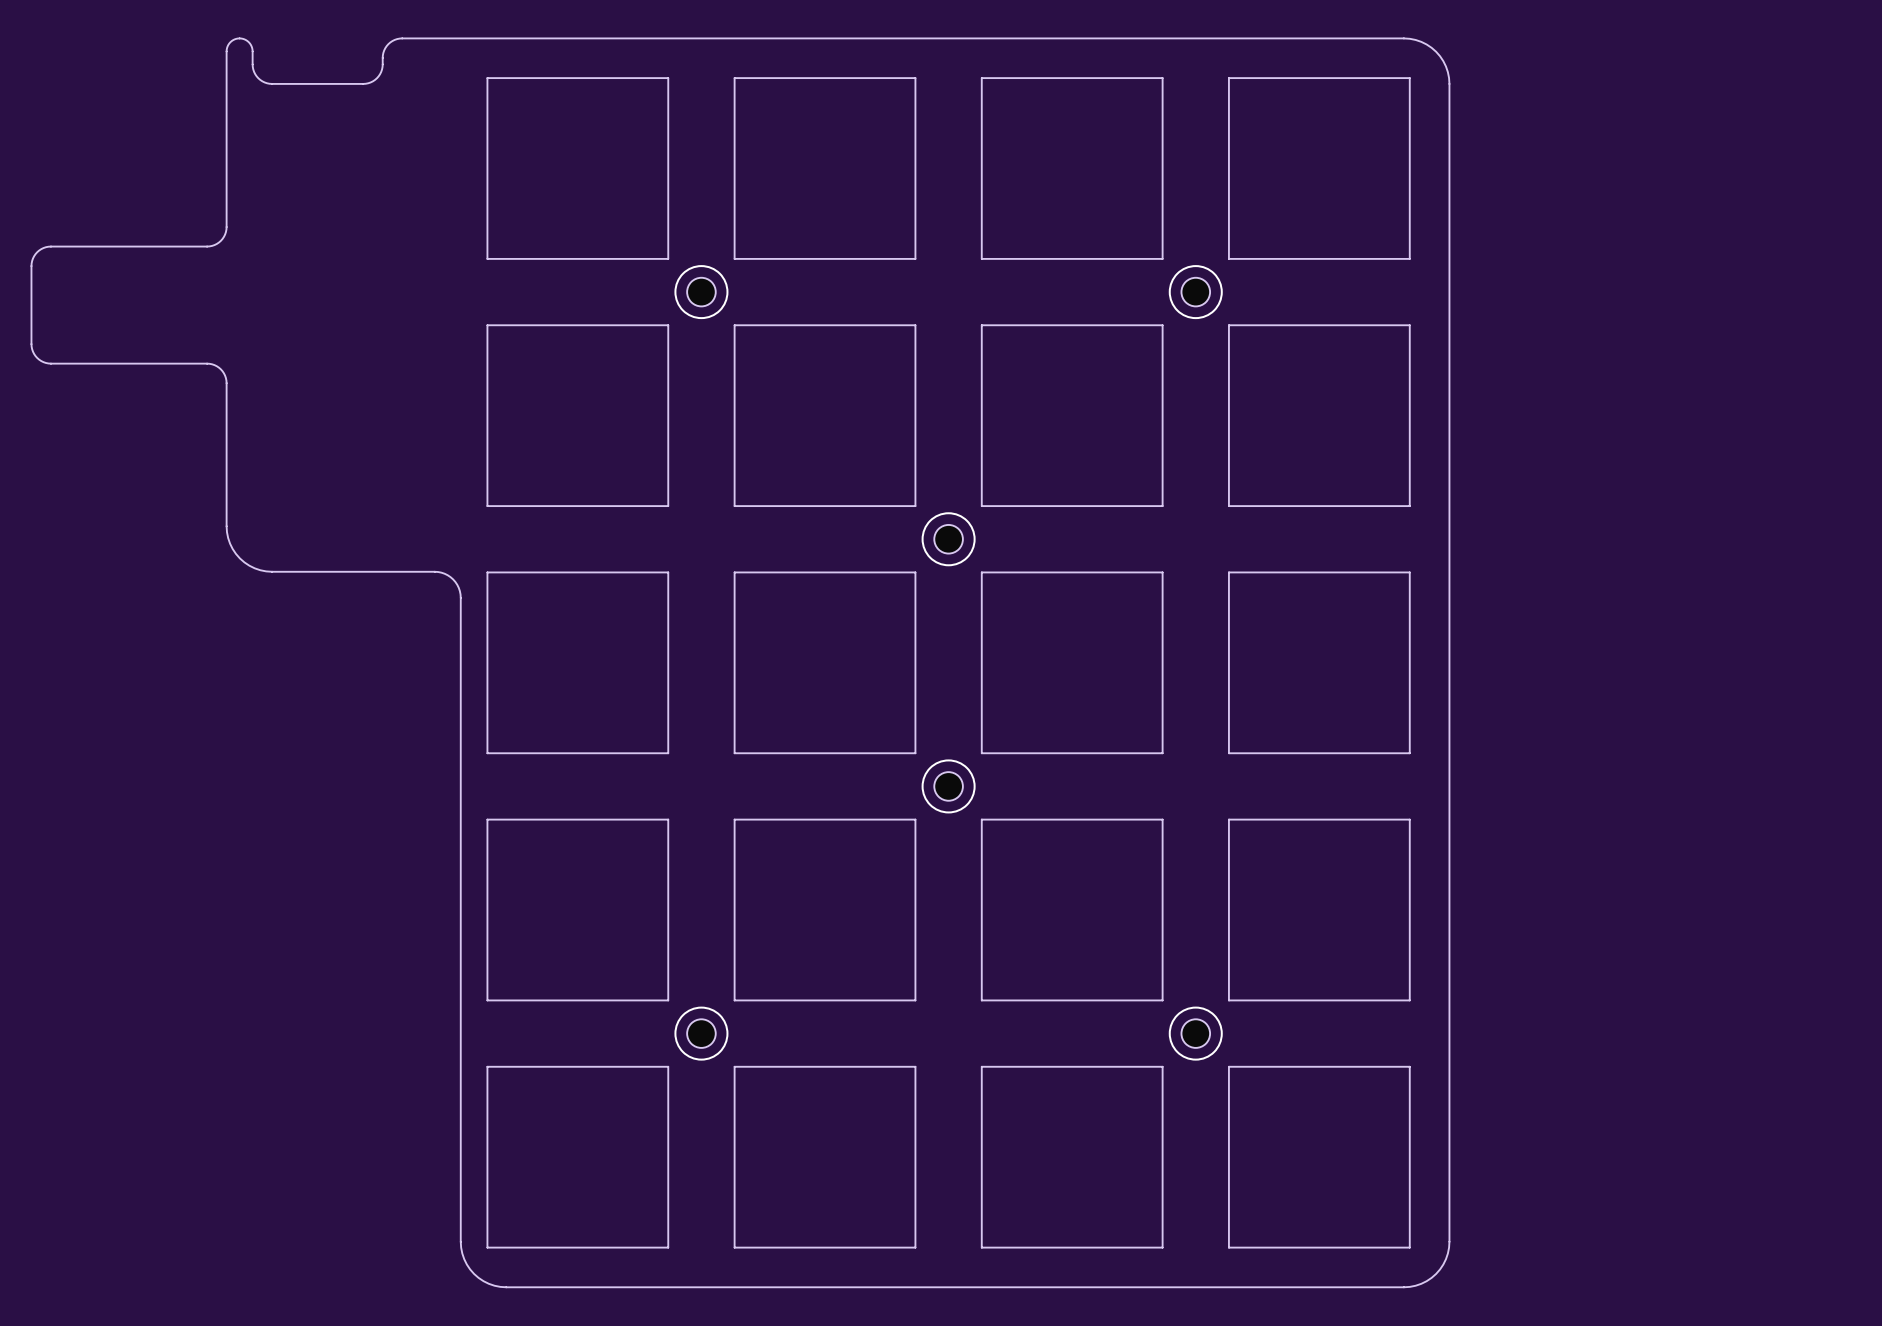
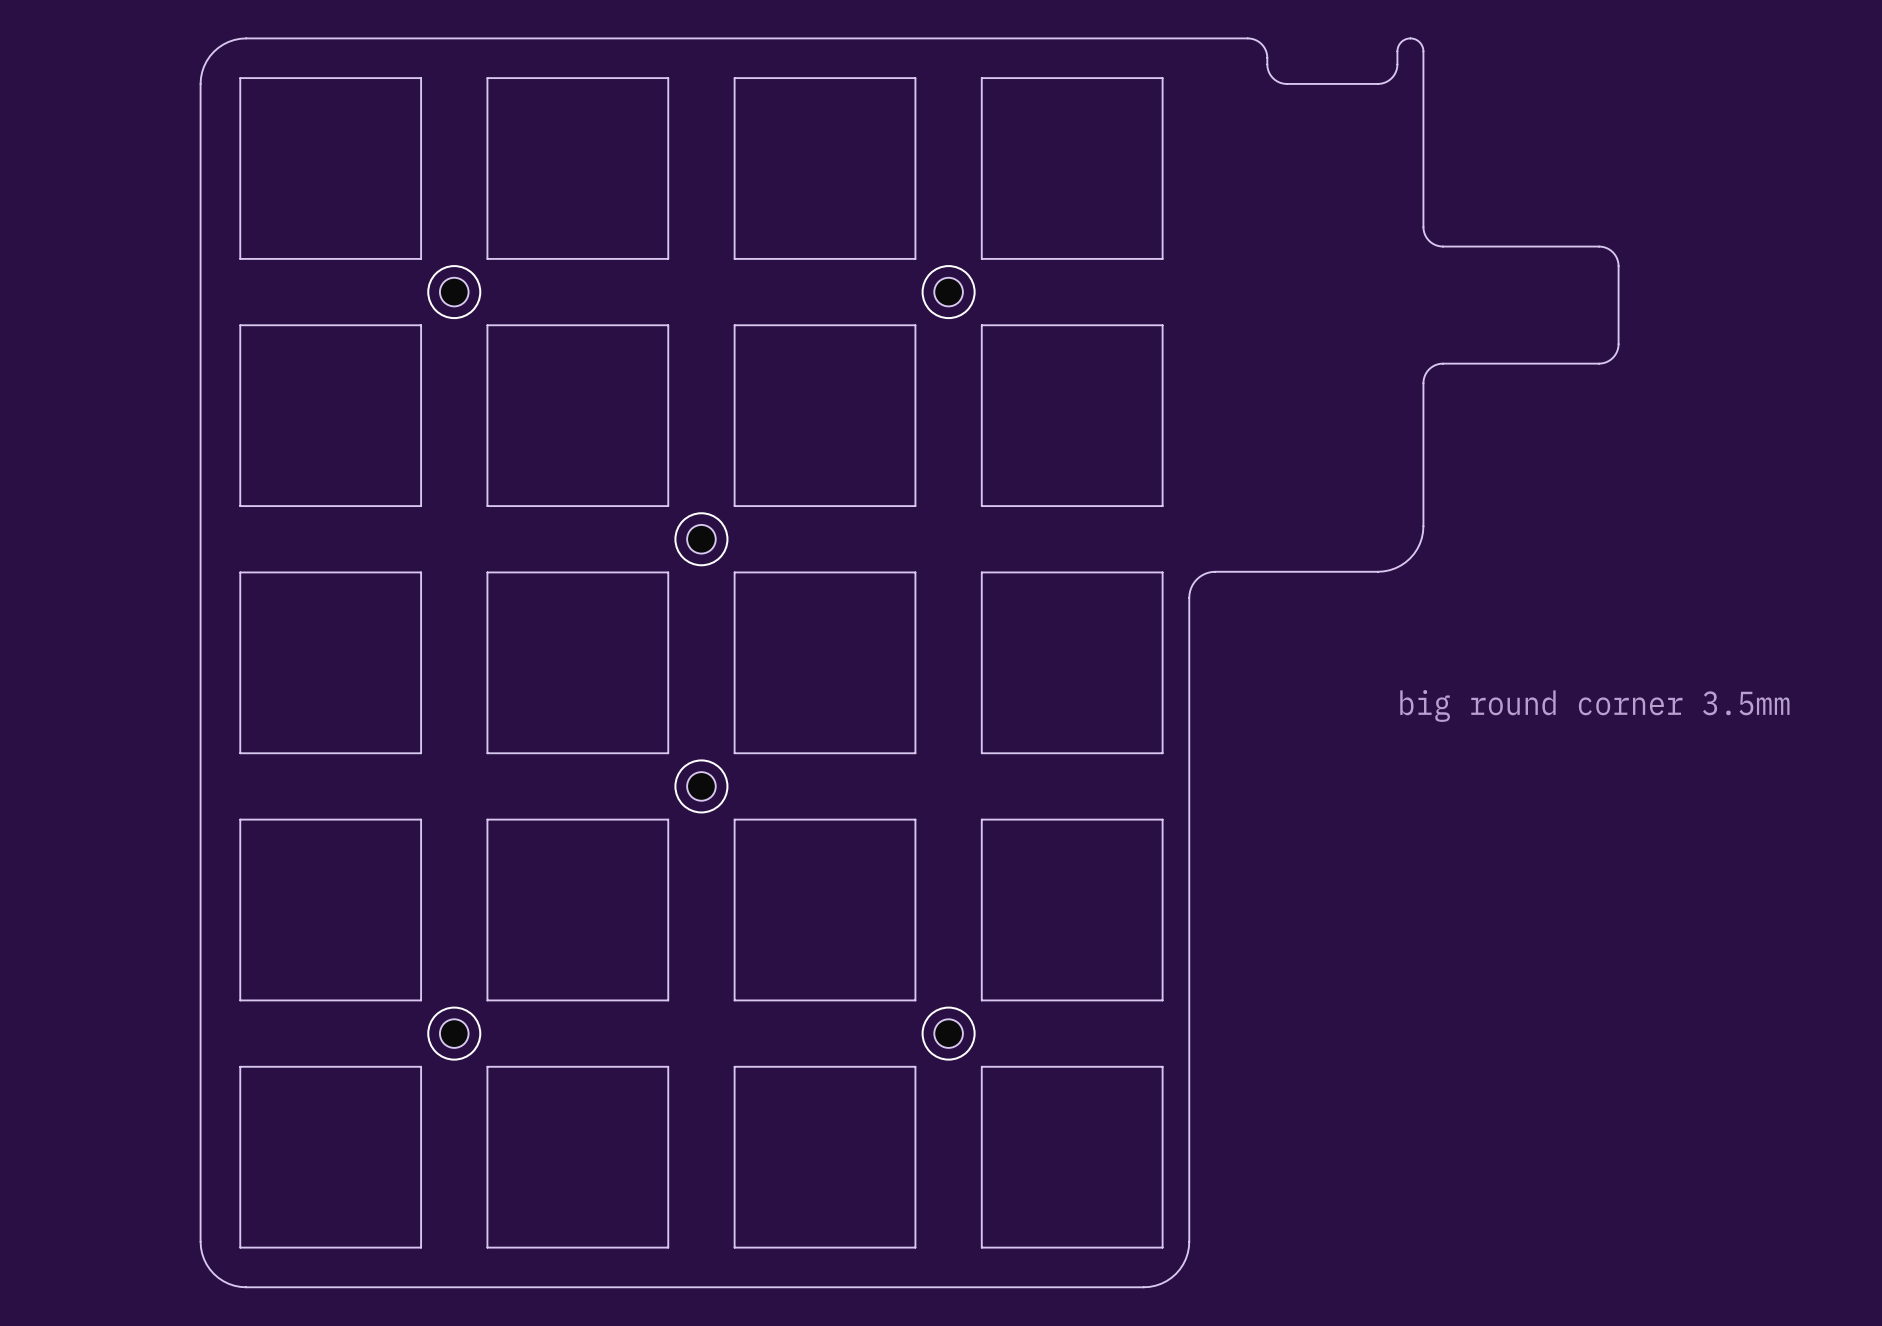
board edge: (402, 38) (392, 41) (386, 46) (383, 52) (380, 74) (372, 81) (363, 83) (267, 83) (258, 78) (254, 71) (252, 49) (249, 43) (241, 38) (231, 41) (226, 51) (226, 227) (223, 236) (216, 243) (209, 246) (50, 246) (41, 249) (34, 256) (31, 263) (31, 346) (37, 357) (48, 363) (207, 363) (220, 369) (226, 383) (226, 532) (232, 549) (239, 558) (249, 565) (260, 570) (272, 571) (438, 572) (447, 575) (457, 584) (460, 597) (461, 1247) (464, 1259) (474, 1273) (488, 1283) (506, 1287) -> (402, 38) (240, 38) (228, 41) (213, 51) (204, 66) (200, 78) (200, 1247) (204, 1259) (213, 1273) (228, 1283) (240, 1286) (506, 1287)
board edge: (1247, 38) (1409, 38) (1421, 41) (1436, 51) (1445, 66) (1449, 78) (1449, 1247) (1445, 1259) (1436, 1273) (1421, 1283) (1409, 1286) (1143, 1287) -> (1247, 38) (1257, 41) (1263, 46) (1266, 52) (1269, 74) (1277, 81) (1286, 83) (1382, 83) (1391, 78) (1395, 71) (1397, 49) (1400, 43) (1408, 38) (1418, 41) (1423, 51) (1423, 227) (1426, 236) (1433, 243) (1440, 246) (1599, 246) (1608, 249) (1615, 256) (1618, 263) (1618, 346) (1612, 357) (1601, 363) (1442, 363) (1429, 369) (1423, 383) (1423, 532) (1417, 549) (1410, 558) (1400, 565) (1389, 570) (1377, 571) (1211, 572) (1202, 575) (1192, 584) (1189, 597) (1188, 1247) (1185, 1259) (1175, 1273) (1161, 1283) (1143, 1287)
drawing: none -> [240, 78, 422, 259]
drawing: [1228, 78, 1410, 259] -> none
part: none -> (454, 292)
part position: (701, 292) -> (948, 292)
part: (1195, 292) -> none
drawing: none -> [240, 325, 422, 507]
drawing: [1228, 325, 1410, 507] -> none
part position: (948, 539) -> (701, 539)
drawing: none -> [240, 572, 422, 754]
drawing: [1228, 572, 1410, 754] -> none
text: none -> big round corner 3.5mm (1594, 706)
part position: (948, 786) -> (701, 786)
drawing: none -> [240, 819, 422, 1001]
drawing: [1228, 819, 1410, 1001] -> none
part: none -> (454, 1033)
part position: (701, 1033) -> (948, 1033)
part: (1195, 1033) -> none
drawing: none -> [240, 1066, 422, 1248]
drawing: [1228, 1066, 1410, 1248] -> none

